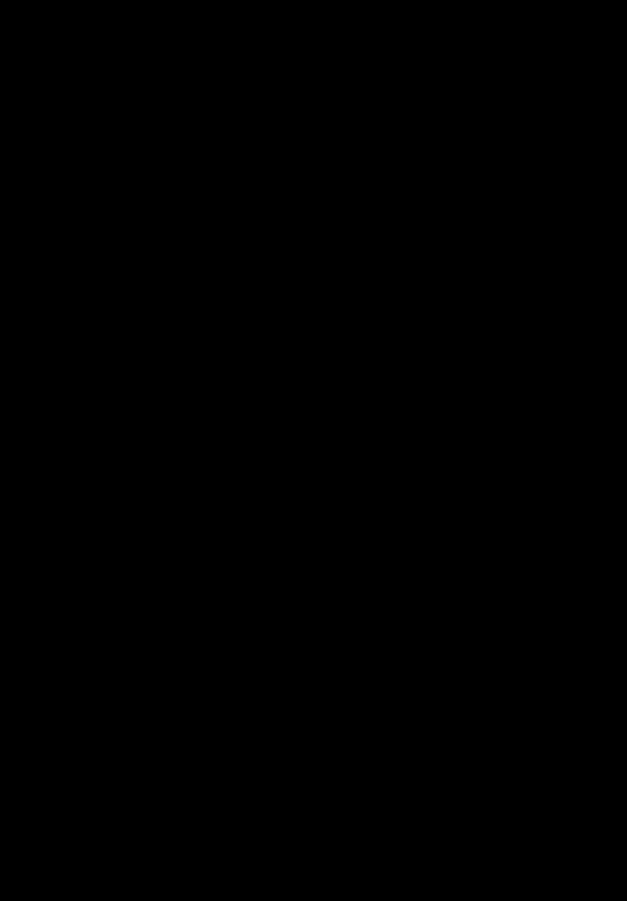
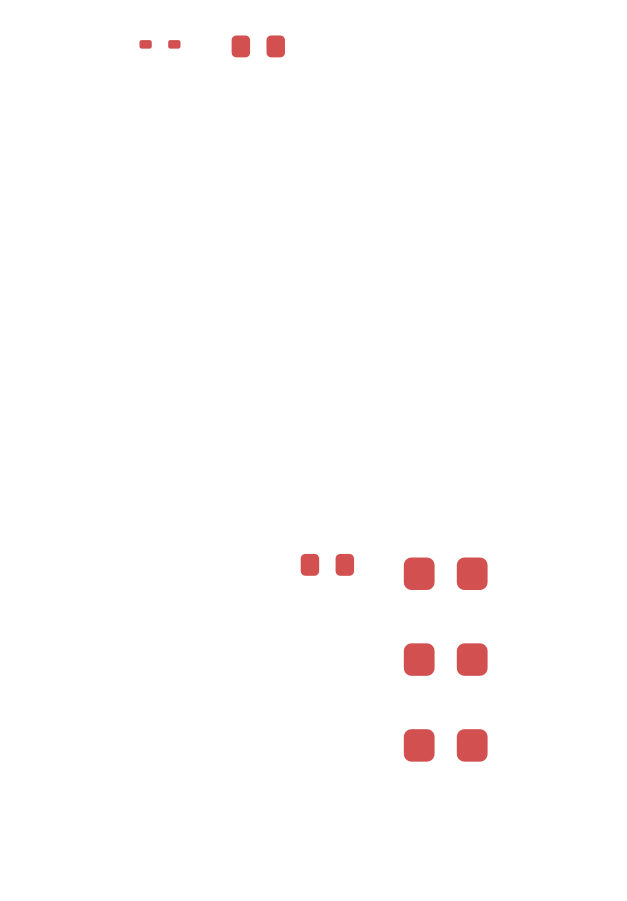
part: none -> (159, 44)
part: none -> (258, 46)
part: none -> (327, 564)
part: none -> (445, 573)
part: none -> (445, 659)
part: none -> (445, 745)

